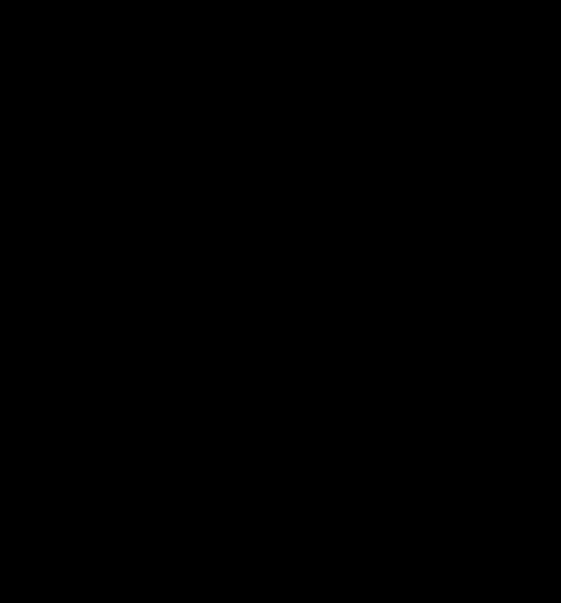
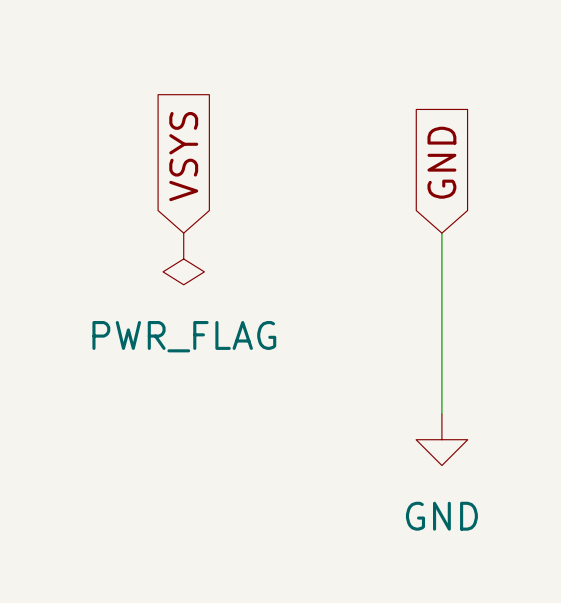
global label: none -> VSYS (183, 156)
global label: none -> GND (441, 162)
wire: none -> (441, 233) (441, 413)
power symbol: none -> PWR_FLAG (183, 258)
power symbol: none -> GND (441, 439)

